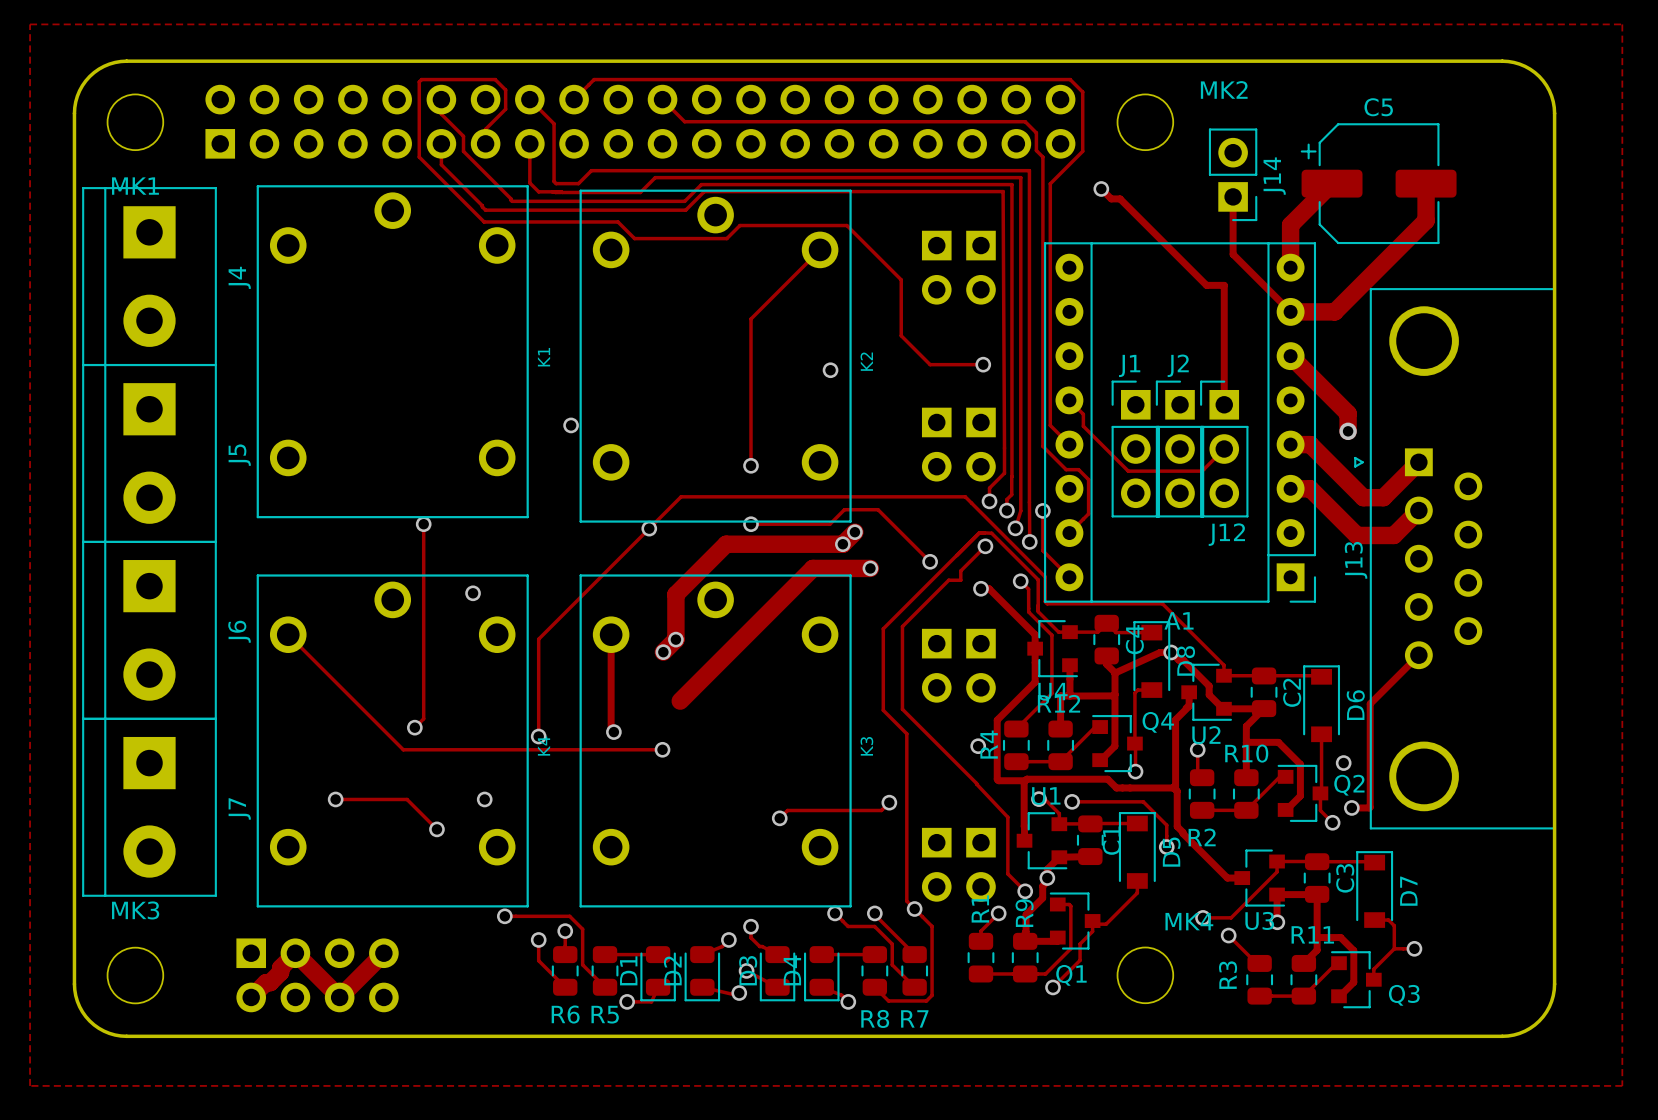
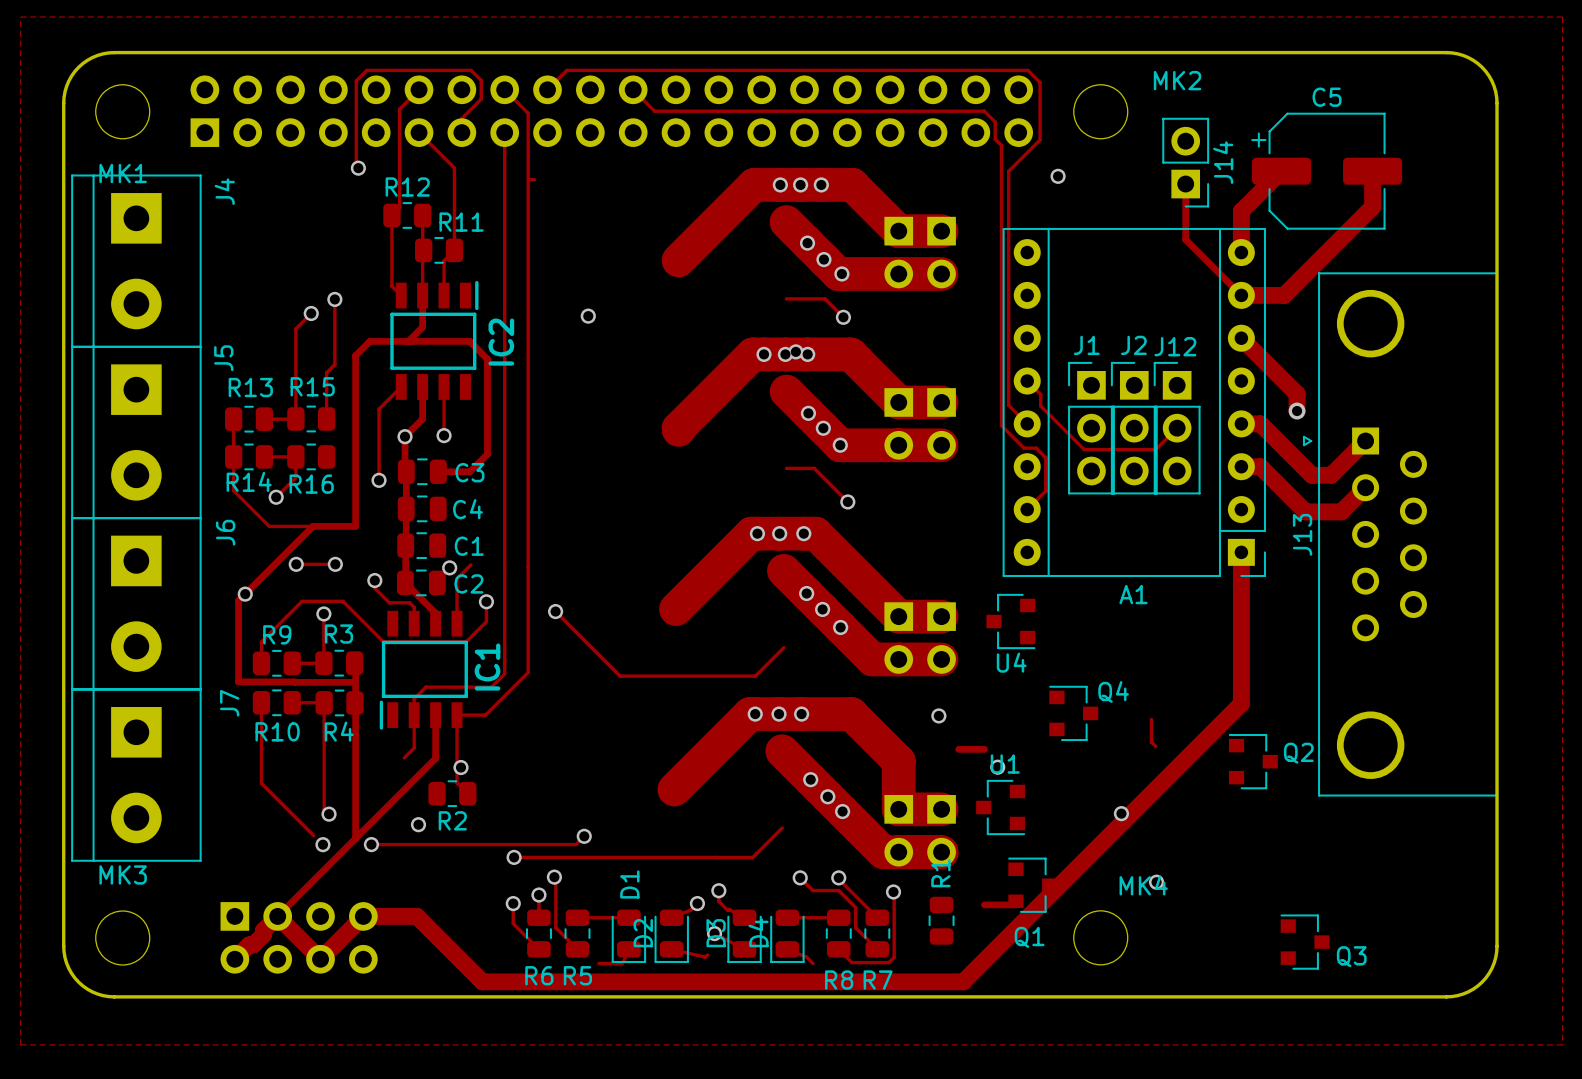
track: (421, 79) (419, 81) (419, 157) (484, 221) (617, 221) (634, 238) (726, 238) (739, 225) (846, 225) (901, 279) (901, 335) (930, 364) (983, 364) -> (399, 70) (366, 70) (356, 81) (356, 166) (359, 169)
track: (441, 99) (441, 114) (463, 136) (463, 151) (512, 201) (684, 201) (701, 184) (1011, 184) (1011, 476) -> (419, 89) (399, 109) (399, 207) (391, 215) (391, 286) (401, 295)
track: (441, 143) (441, 164) (485, 210) (685, 210) (704, 191) (1003, 191) (1004, 473) (989, 488) (989, 501) -> (419, 132) (454, 168) (454, 250) (444, 260) (444, 295)
track: (1029, 170) (591, 170) (578, 183) (556, 183) (554, 181) -> (467, 793) (457, 782) (457, 715) (485, 715) (528, 672) (528, 169)
track: (1029, 170) (1029, 541) -> none
via: none -> (358, 168)
track: (529, 182) (538, 191) (640, 192) (655, 177) (1020, 177) (1020, 510) (1015, 528) -> (504, 170) (504, 673) (491, 687) (425, 687) (414, 698) (414, 748) (404, 757)
track: (1101, 188) (1111, 198) (1120, 198) (1206, 285) (1224, 285) (1224, 404) -> none
via: none -> (780, 184)
via: none -> (800, 184)
via: none -> (821, 184)
track: none -> (422, 215) (422, 327) (408, 341)
track: none -> (786, 222) (838, 273) (941, 273)
track: none -> (941, 231) (898, 231) (852, 184) (754, 184) (678, 260)
track: (820, 249) (750, 319) (750, 465) -> none
via: none -> (807, 243)
via: none -> (823, 259)
J4 name position: J4 (239, 277) -> J4 (224, 191)
via: none -> (841, 273)
track: none -> (786, 298) (825, 298) (843, 317)
track: none -> (334, 299) (334, 364) (326, 372) (326, 418)
via: none -> (334, 299)
track: none -> (311, 313) (295, 328) (295, 418)
via: none -> (311, 313)
via: none -> (588, 316)
via: none -> (843, 317)
K1: (392, 351) -> none
K2: (715, 356) -> none
IC2: none -> (434, 340)
via: (983, 364) -> none
via: none -> (764, 354)
via: none -> (785, 354)
via: none -> (807, 354)
track: none -> (401, 386) (379, 409) (379, 480)
track: none -> (422, 386) (422, 419) (405, 436) (406, 508)
track: none -> (444, 386) (444, 435)
track: none -> (786, 391) (840, 445) (941, 445)
track: none -> (941, 402) (898, 402) (850, 354) (752, 354) (678, 429)
via: (571, 425) -> none
via: none -> (808, 413)
track: none -> (233, 419) (233, 490) (269, 526) (355, 526)
R13: none -> (249, 419)
track: none -> (264, 419) (295, 419)
R15: none -> (311, 418)
via: none -> (823, 428)
J5 name position: J5 (239, 455) -> J5 (223, 358)
via: none -> (444, 435)
via: none -> (405, 436)
via: (750, 465) -> none
via: none -> (840, 445)
track: (1011, 476) (1011, 494) (1006, 499) (1006, 510) -> none
R14: none -> (249, 456)
track: none -> (264, 456) (295, 456) (295, 477) (276, 497)
R16: none -> (311, 456)
track: none -> (786, 468) (814, 468) (848, 502)
track: none -> (438, 471) (469, 471) (487, 454) (487, 359) (469, 341) (369, 341) (355, 355) (355, 526)
via: (989, 501) -> none
via: (1006, 510) -> none
track: (1042, 510) (1042, 550) (1069, 577) -> none
via: (1042, 510) -> none
via: none -> (276, 497)
track: (423, 524) (423, 718) (414, 727) -> none
via position: (423, 524) -> (379, 480)
track: (750, 524) (829, 524) (844, 509) (878, 509) (930, 561) -> none
via: (750, 524) -> none
via: none -> (847, 501)
via: (649, 528) -> none
via: (1015, 528) -> none
track: none -> (406, 508) (405, 582) (435, 613) (435, 623)
track: (854, 532) (842, 544) (726, 544) (675, 594) (675, 639) (663, 652) -> none
via: (854, 532) -> none
track: (984, 532) (991, 533) (1038, 579) (1038, 611) (1058, 632) (1097, 632) (1106, 623) (1116, 632) (1151, 632) -> none
track: (984, 532) (979, 532) (883, 628) (883, 710) (906, 733) (906, 901) (932, 926) -> none
J12 name position: J12 (1226, 534) -> J12 (1175, 346)
via: (1029, 541) -> none
via position: (842, 544) -> (803, 533)
track: (985, 546) (960, 570) (960, 580) (948, 580) (902, 626) (902, 709) (1007, 817) (1007, 873) (1025, 891) -> none
via: (985, 546) -> none
track: none -> (355, 526) (312, 526) (238, 600) (238, 681) (355, 682)
via: none -> (757, 533)
via: none -> (779, 533)
via: (930, 561) -> none
track: (870, 568) (812, 568) (680, 701) -> none
via: (870, 568) -> none
track: none -> (1241, 552) (1241, 703) (963, 981) (482, 981) (416, 916) (363, 916)
track: (1020, 581) (1028, 589) (1028, 612) (1051, 635) (1051, 693) (1016, 729) -> none
via: (1020, 581) -> none
track: (980, 588) (989, 588) (1035, 634) (1035, 682) (997, 720) (997, 779) (998, 781) (1028, 780) -> none
via: (980, 588) -> none
track: none -> (296, 564) (335, 564)
via: none -> (296, 564)
via: none -> (335, 564)
track: none -> (470, 564) (457, 578) (457, 623)
track: none -> (783, 570) (872, 659) (941, 659)
track: none -> (374, 580) (374, 588) (389, 602) (409, 602) (414, 607) (414, 623)
via: none -> (374, 580)
C4 footprint: [1093, 614, 1121, 665] -> [397, 495, 447, 523]
via: none -> (806, 593)
via: none -> (245, 594)
track: none -> (486, 601) (486, 621) (466, 641) (383, 641) (342, 601) (302, 601) (261, 641) (261, 663)
via: none -> (486, 601)
J6 name position: J6 (239, 631) -> J6 (225, 532)
track: (288, 634) (403, 749) (662, 749) -> none
track: (611, 634) (611, 729) (613, 732) -> none
track: none -> (675, 609) (751, 533) (815, 533) (898, 616) (941, 616)
via: none -> (822, 609)
track: none -> (555, 611) (620, 676) (755, 676) (783, 647)
via: none -> (555, 611)
via: (675, 639) -> none
track: none -> (323, 613) (323, 663)
via: none -> (323, 613)
via: (663, 652) -> none
via: (1171, 652) -> none
via: none -> (840, 627)
track: (1106, 655) (1106, 664) (1115, 672) (1115, 694) -> none
track: (1418, 655) (1370, 703) (1370, 807) (1351, 807) -> none
D8: (1151, 659) -> none
track: (1069, 665) (1069, 696) -> none
C2 footprint: [1250, 667, 1278, 718] -> [396, 569, 446, 597]
track: (1114, 673) (1160, 652) (1171, 652) (1179, 660) (1183, 660) (1209, 686) (1209, 694) (1223, 708) (1263, 708) -> none
track: (1320, 675) (1223, 675) (1223, 665) (1162, 603) (1047, 603) (1045, 601) (1045, 576) (965, 496) (681, 496) (538, 639) (538, 736) -> none
track: (1151, 690) (1137, 690) (1134, 692) (1135, 771) -> none
track: none -> (292, 663) (323, 663)
track: none -> (354, 663) (355, 838)
U2: (1206, 692) -> none
track: (1115, 694) (1069, 696) -> none
track: (1115, 694) (1114, 746) (1100, 760) -> none
track: (1069, 696) (1060, 695) (1060, 729) -> none
IC1: none -> (423, 670)
D6: (1321, 703) -> none
track: (1184, 707) (1189, 702) (1189, 692) (1189, 706) (1175, 719) (1177, 826) (1227, 878) (1242, 878) -> none
track: (1264, 708) (1246, 726) (1246, 742) -> none
R4 footprint: [1002, 720, 1030, 771] -> [315, 689, 364, 717]
R12 footprint: [1047, 720, 1075, 771] -> [383, 202, 432, 229]
via: (414, 727) -> none
track: (1100, 727) (1095, 727) (1060, 761) (1016, 761) -> none
track: none -> (261, 702) (261, 783) (313, 835)
track: none -> (292, 702) (323, 702)
track: none -> (324, 702) (324, 809) (329, 814)
via: (613, 732) -> none
track: (1321, 734) (1320, 810) (1334, 824) -> none
via: (538, 736) -> none
K4: (392, 740) -> none
K3: (715, 740) -> none
track: (1246, 742) (1278, 742) (1300, 764) (1300, 796) (1285, 809) -> none
track: (1246, 742) (1246, 777) -> none
via: none -> (755, 714)
via: none -> (779, 714)
via: none -> (801, 714)
R4 name position: R4 (989, 744) -> R4 (339, 731)
track: none -> (435, 715) (435, 758) (277, 916)
via: (662, 749) -> none
via: (1197, 749) -> none
R10 name position: R10 (1246, 753) -> R10 (277, 731)
via: (1343, 763) -> none
R2 footprint: [1188, 769, 1216, 819] -> [428, 780, 477, 808]
R10 footprint: [1232, 769, 1260, 819] -> [252, 689, 301, 717]
via: (1135, 771) -> none
track: (1285, 776) (1279, 776) (1246, 810) (1202, 810) -> none
track: none -> (782, 751) (883, 852) (941, 852)
track: (1175, 785) (1172, 787) (1116, 787) (1107, 779) (1026, 779) (1024, 781) (1024, 840) -> none
track: (335, 799) (407, 799) (436, 829) -> none
via: (335, 799) -> none
track: (1038, 799) (1044, 799) (1059, 813) (1059, 824) (1137, 823) -> none
track: (1072, 801) (1143, 801) (1166, 825) (1166, 847) -> none
via: (1072, 801) -> none
track: (889, 802) (881, 810) (787, 810) (779, 818) -> none
via: (889, 802) -> none
via: (1351, 807) -> none
J7 name position: J7 (239, 808) -> J7 (229, 703)
via: none -> (810, 779)
C1 footprint: [1076, 815, 1104, 866] -> [397, 532, 447, 560]
via: (779, 818) -> none
track: none -> (674, 789) (749, 714) (851, 714) (898, 761) (898, 809) (941, 809)
via: (1332, 822) -> none
via position: (436, 829) -> (418, 824)
via: none -> (827, 796)
via: none -> (842, 811)
via: none -> (329, 814)
D5: (1137, 850) -> none
C3 footprint: [1303, 853, 1331, 903] -> [397, 458, 447, 486]
track: (1090, 856) (1059, 857) (1047, 869) (1047, 881) (1042, 886) (1042, 898) (1026, 914) (1025, 941) (1053, 941) (1056, 938) -> none
track: none -> (782, 828) (752, 857) (717, 857)
track: (1316, 861) (1277, 861) (1277, 871) (1231, 917) (1203, 917) -> none
track: (1317, 861) (1374, 862) -> none
track: none -> (584, 836) (575, 844) (371, 844)
via: none -> (584, 836)
via: (1047, 878) -> none
U3: (1259, 878) -> none
via: none -> (322, 844)
via: none -> (371, 844)
D7: (1374, 889) -> none
via: (1025, 891) -> none
track: none -> (514, 857) (717, 857)
via: none -> (514, 857)
track: (1316, 894) (1277, 894) (1277, 922) -> none
track: (1317, 894) (1317, 950) (1303, 963) -> none
track: (1057, 904) (1070, 906) (1070, 948) (1045, 973) (980, 973) -> none
via position: (914, 909) -> (893, 891)
via: none -> (554, 877)
track: (998, 913) (980, 931) (980, 941) -> none
via: (998, 913) -> none
track: (504, 916) (569, 916) (582, 929) -> (554, 877) (555, 893)
via: (504, 916) -> none
track: (1374, 920) (1388, 920) (1394, 925) (1394, 948) -> none
track: (1092, 921) (1092, 931) (1080, 944) (1080, 960) (1052, 988) -> none
via: (1277, 922) -> none
R9 footprint: [1011, 932, 1039, 983] -> [252, 649, 301, 677]
track: (1228, 935) (1256, 963) (1259, 963) -> none
via: (1228, 935) -> none
track: (1317, 937) (1340, 937) (1353, 950) (1353, 982) (1339, 996) -> none
track: (1394, 948) (1414, 948) -> none
track: (1394, 948) (1373, 969) (1373, 979) -> none
via: (1414, 948) -> none
R3 footprint: [1246, 954, 1274, 1005] -> [315, 649, 364, 677]
R11 footprint: [1290, 954, 1318, 1005] -> [415, 236, 464, 264]
track: (1339, 963) (1336, 963) (1303, 996) -> none
D1 name position: D1 (628, 970) -> D1 (629, 884)
R3 name position: R3 (1228, 975) -> R3 (338, 634)
via: (1052, 987) -> none
via: (739, 993) -> none
track: (1259, 996) (1303, 996) -> none
via: (627, 1001) -> none
via: (848, 1001) -> none

